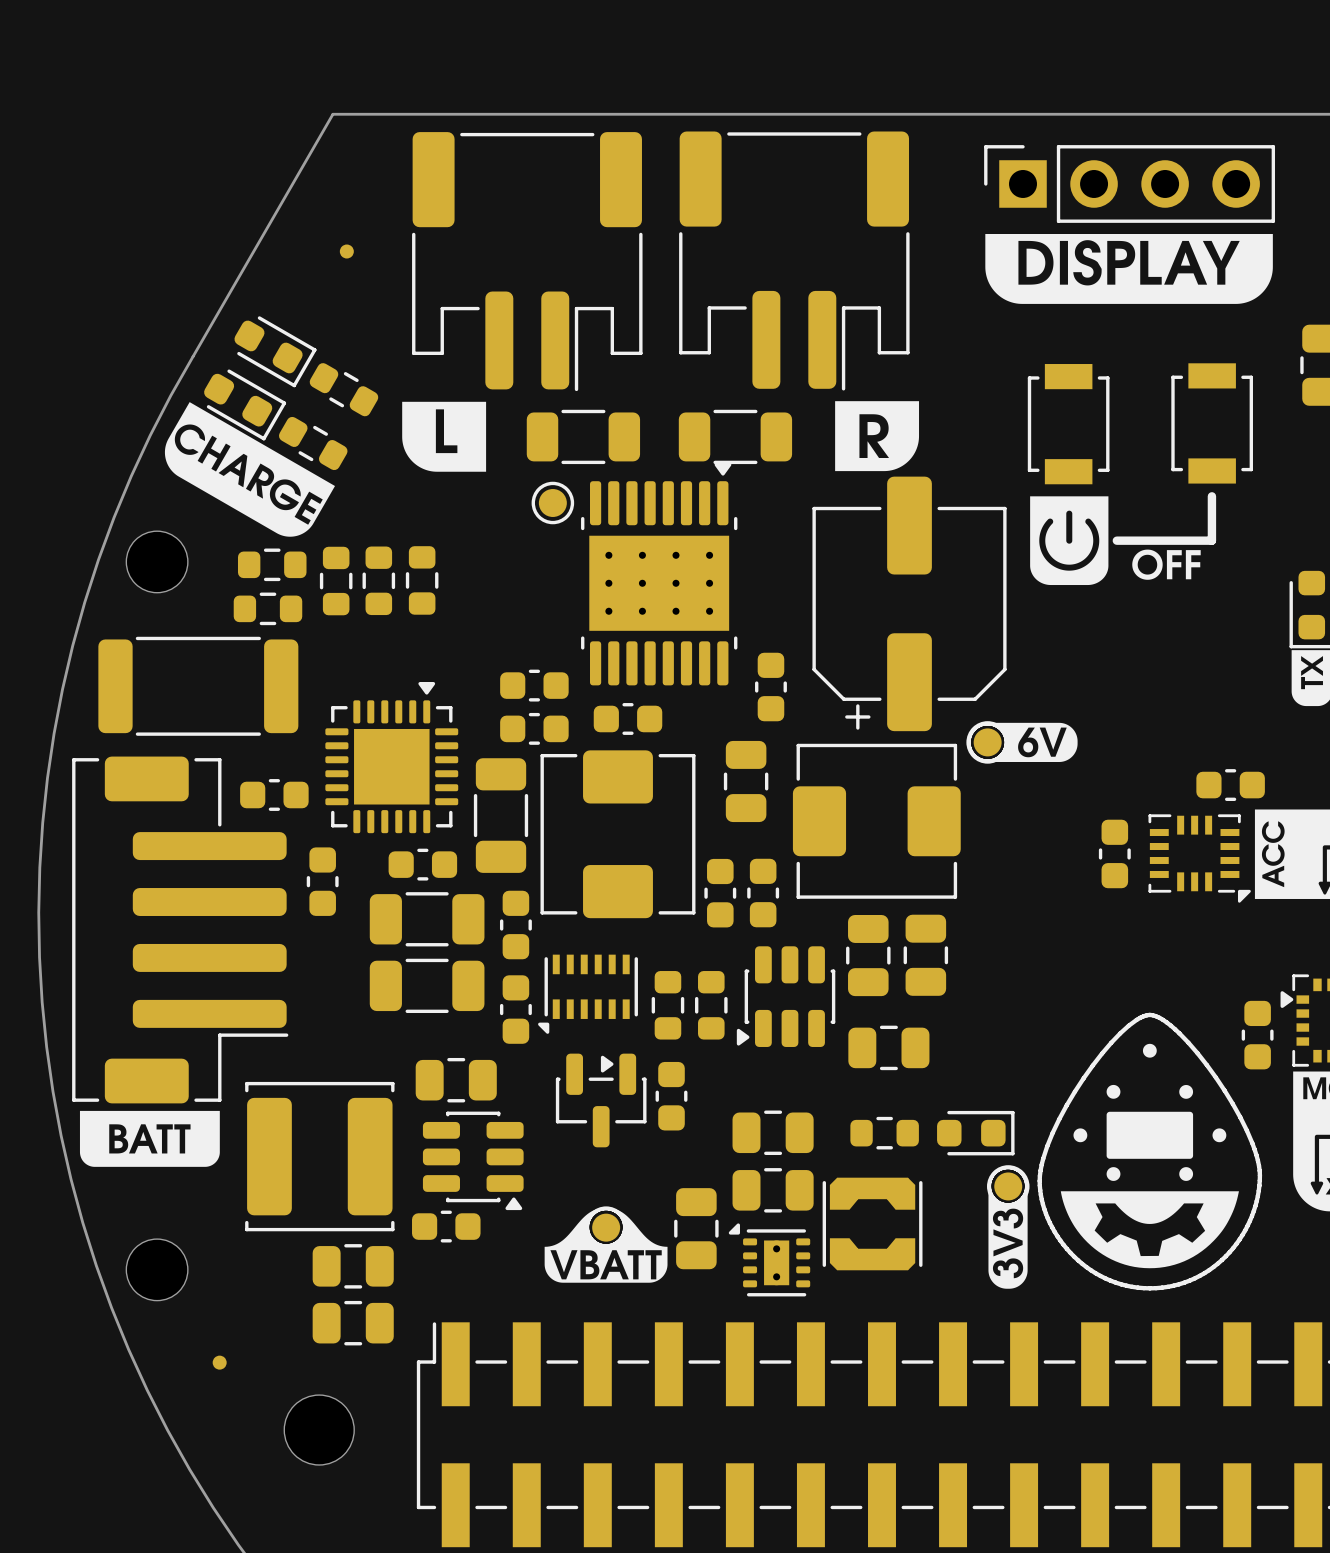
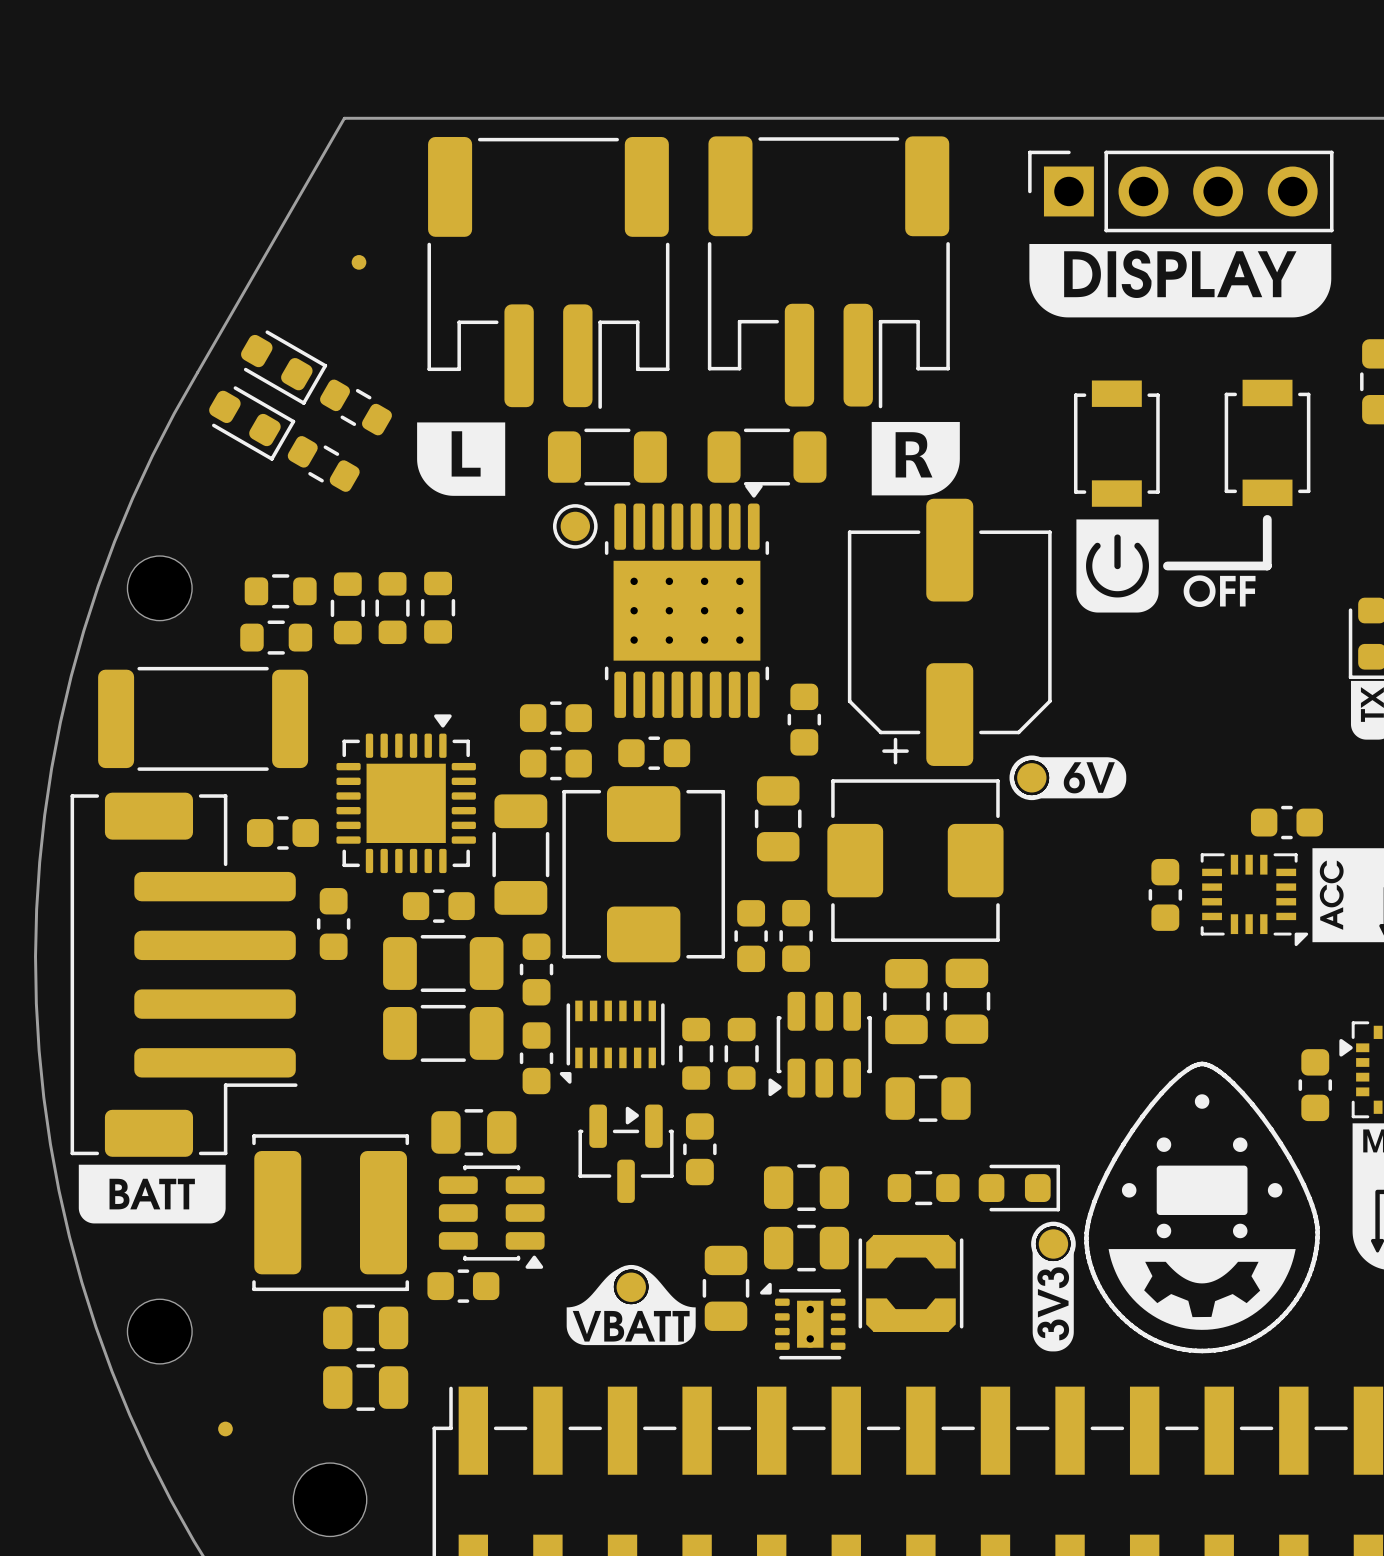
drawing shape: [402, 401, 487, 472] -> [417, 422, 506, 496]
drawing shape: [835, 401, 920, 472] -> [871, 421, 960, 496]
drawing: [164, 402, 335, 537] -> none

